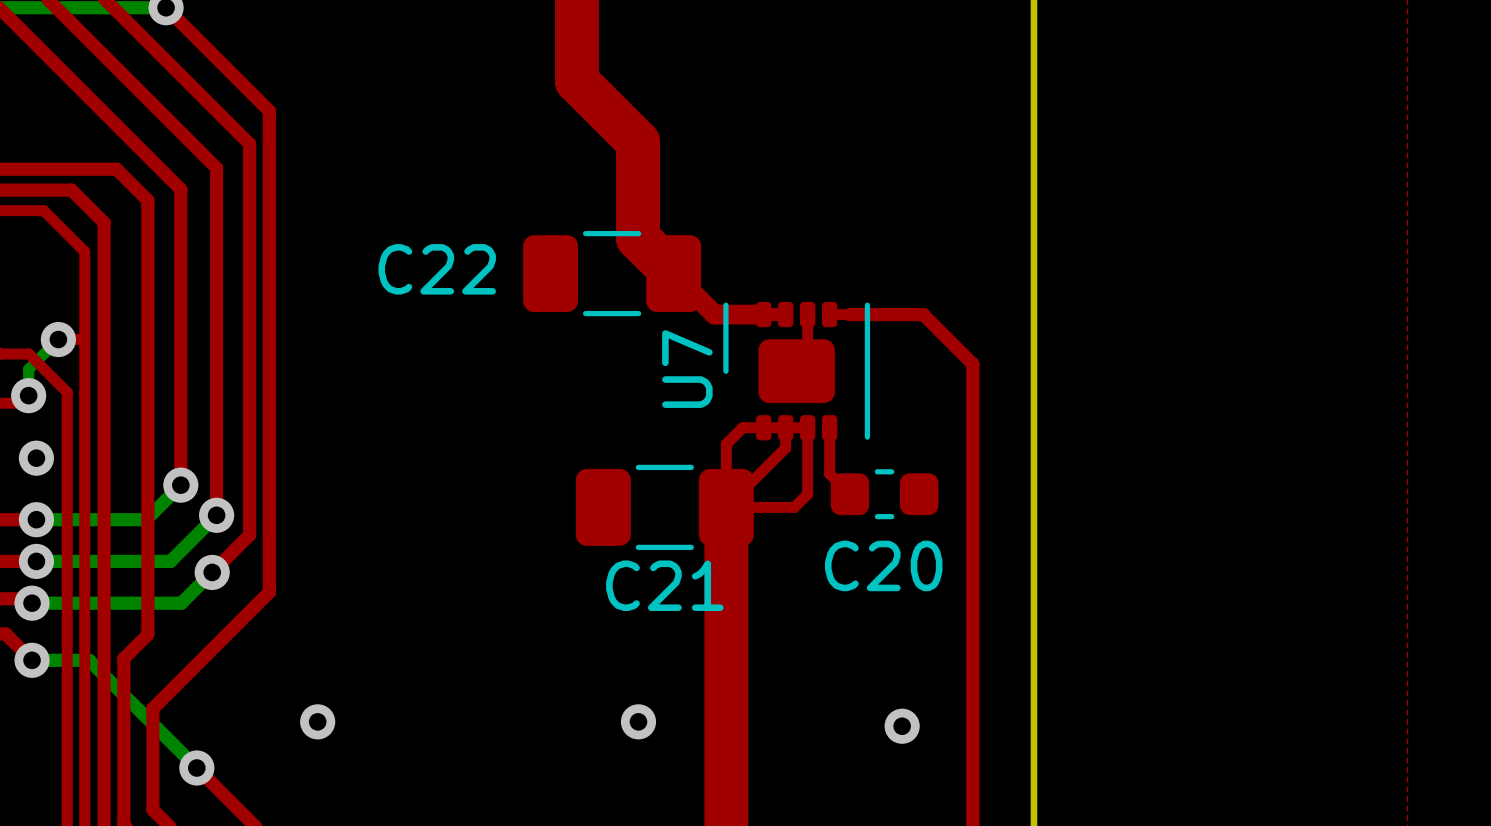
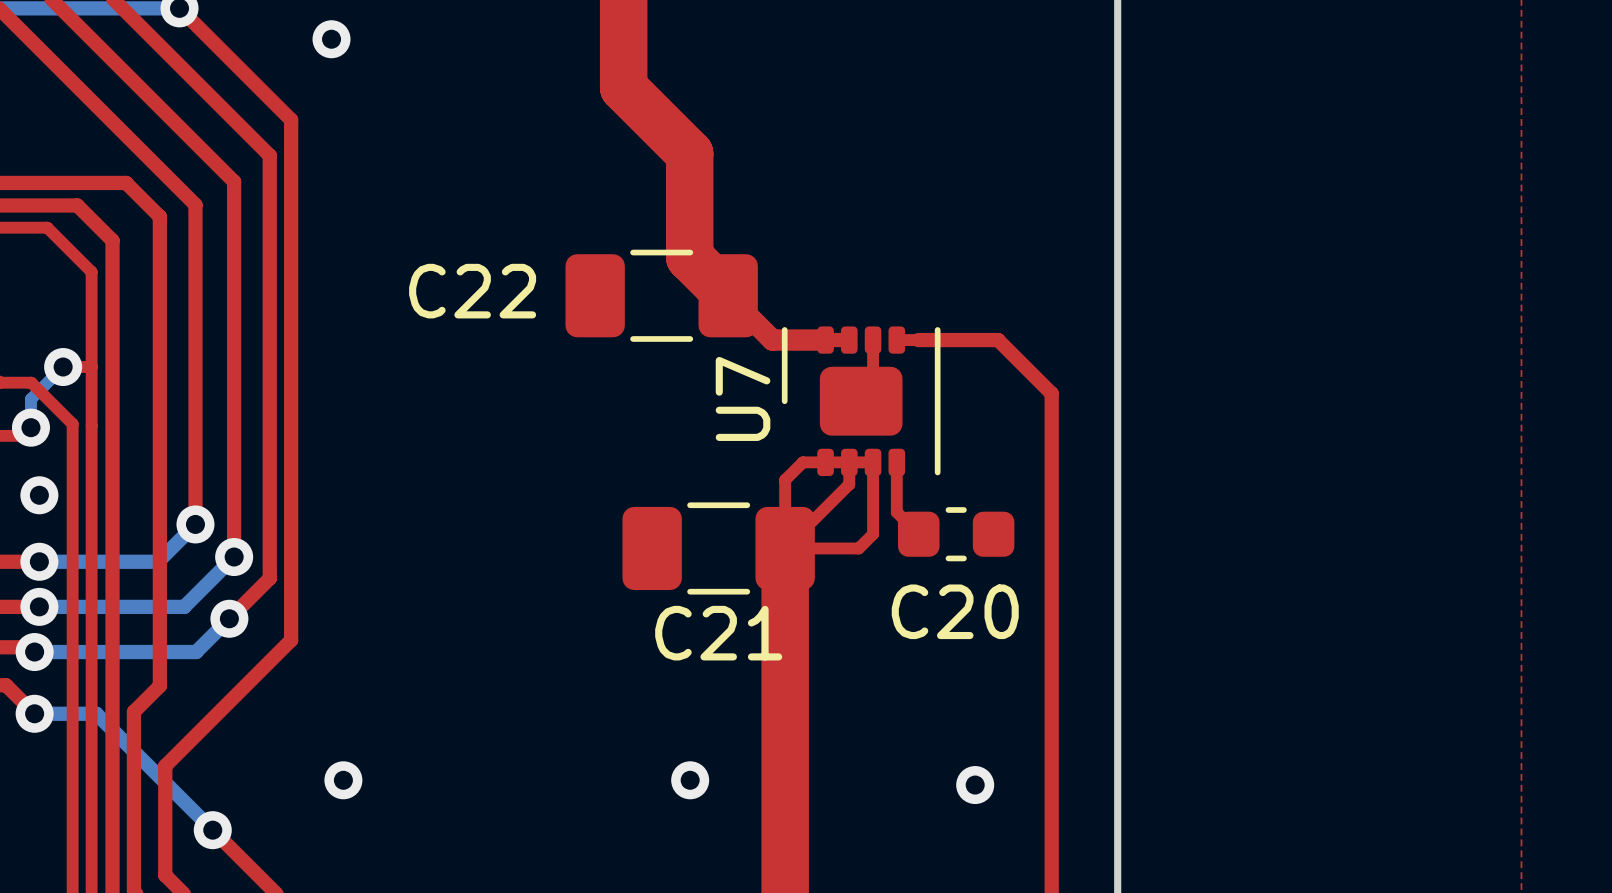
via: none -> (331, 39)

